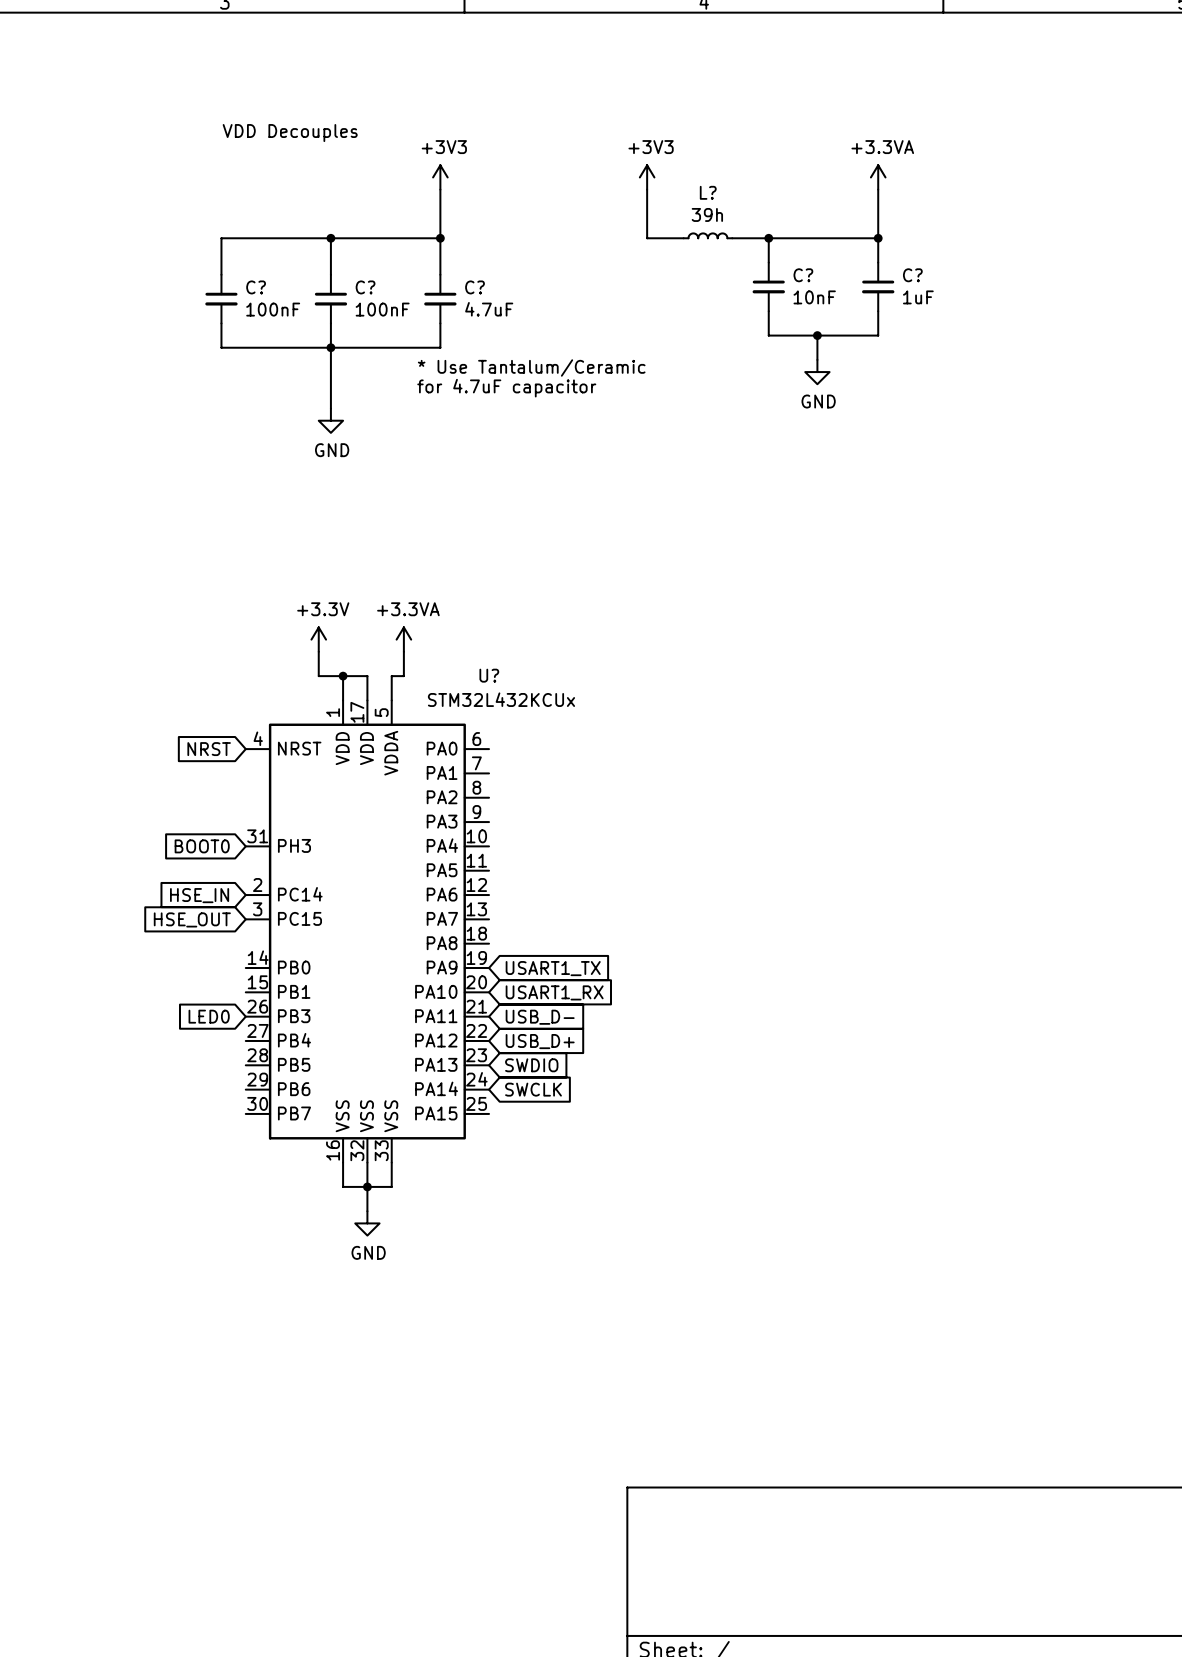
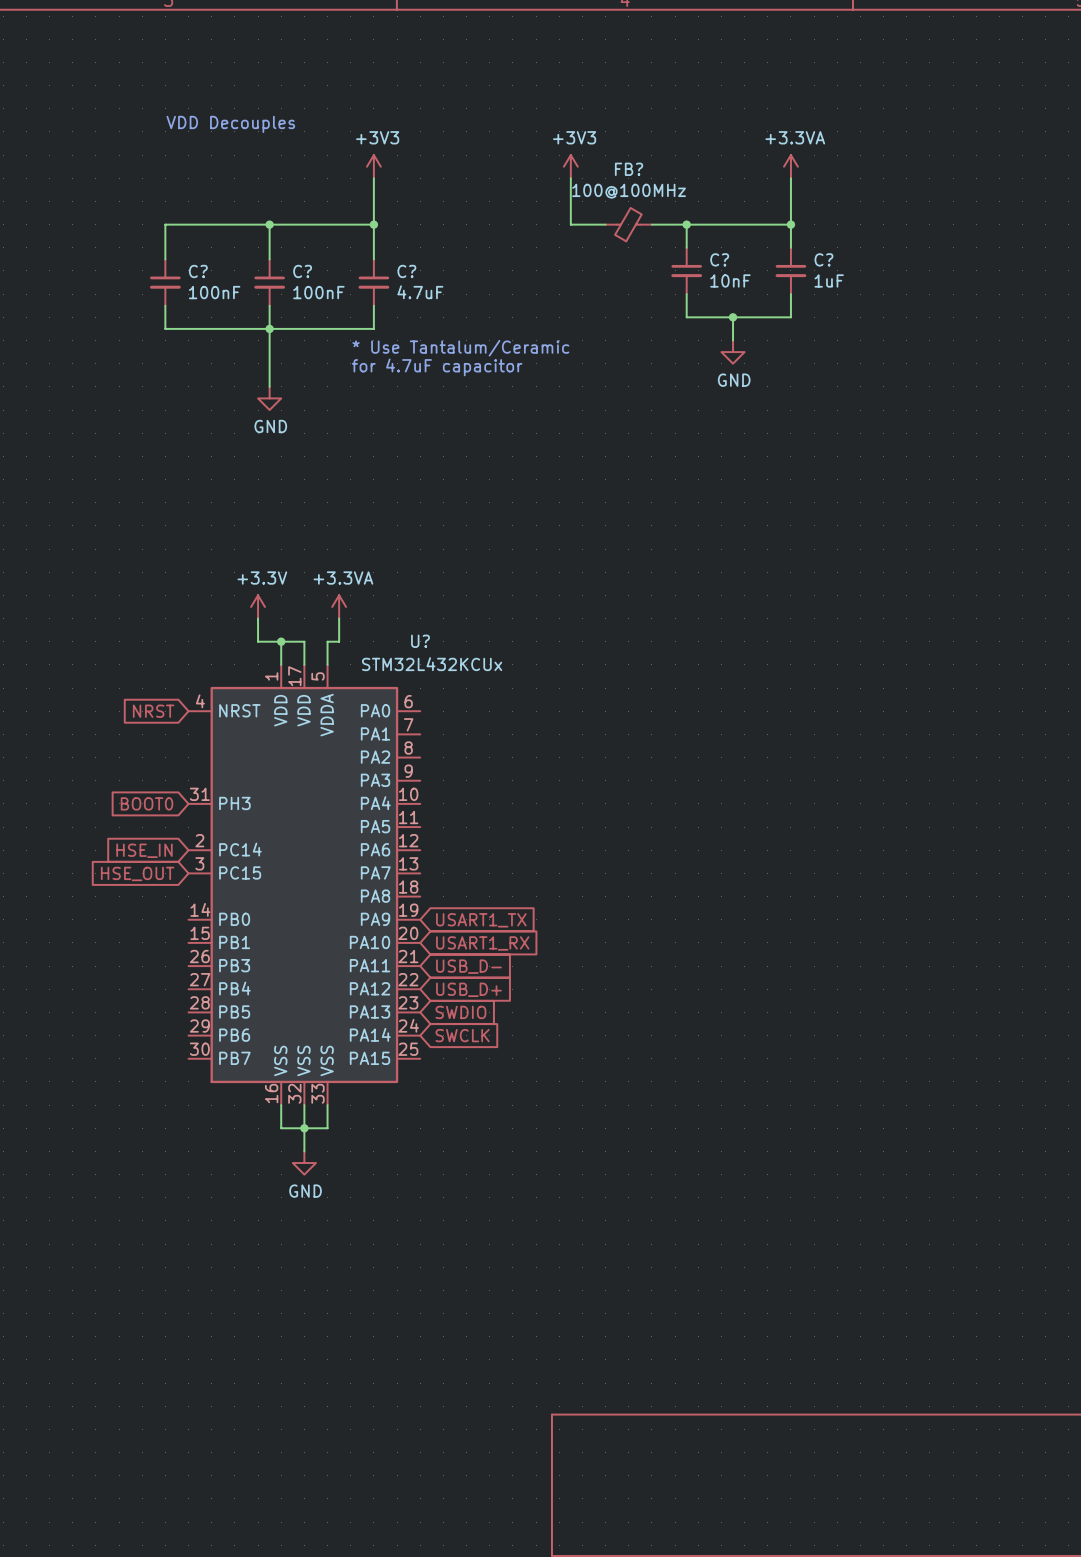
L?: 39h (707, 235) -> none
FB?: none -> 100@100MHz (628, 224)
global label: LED0 (209, 1016) -> none

